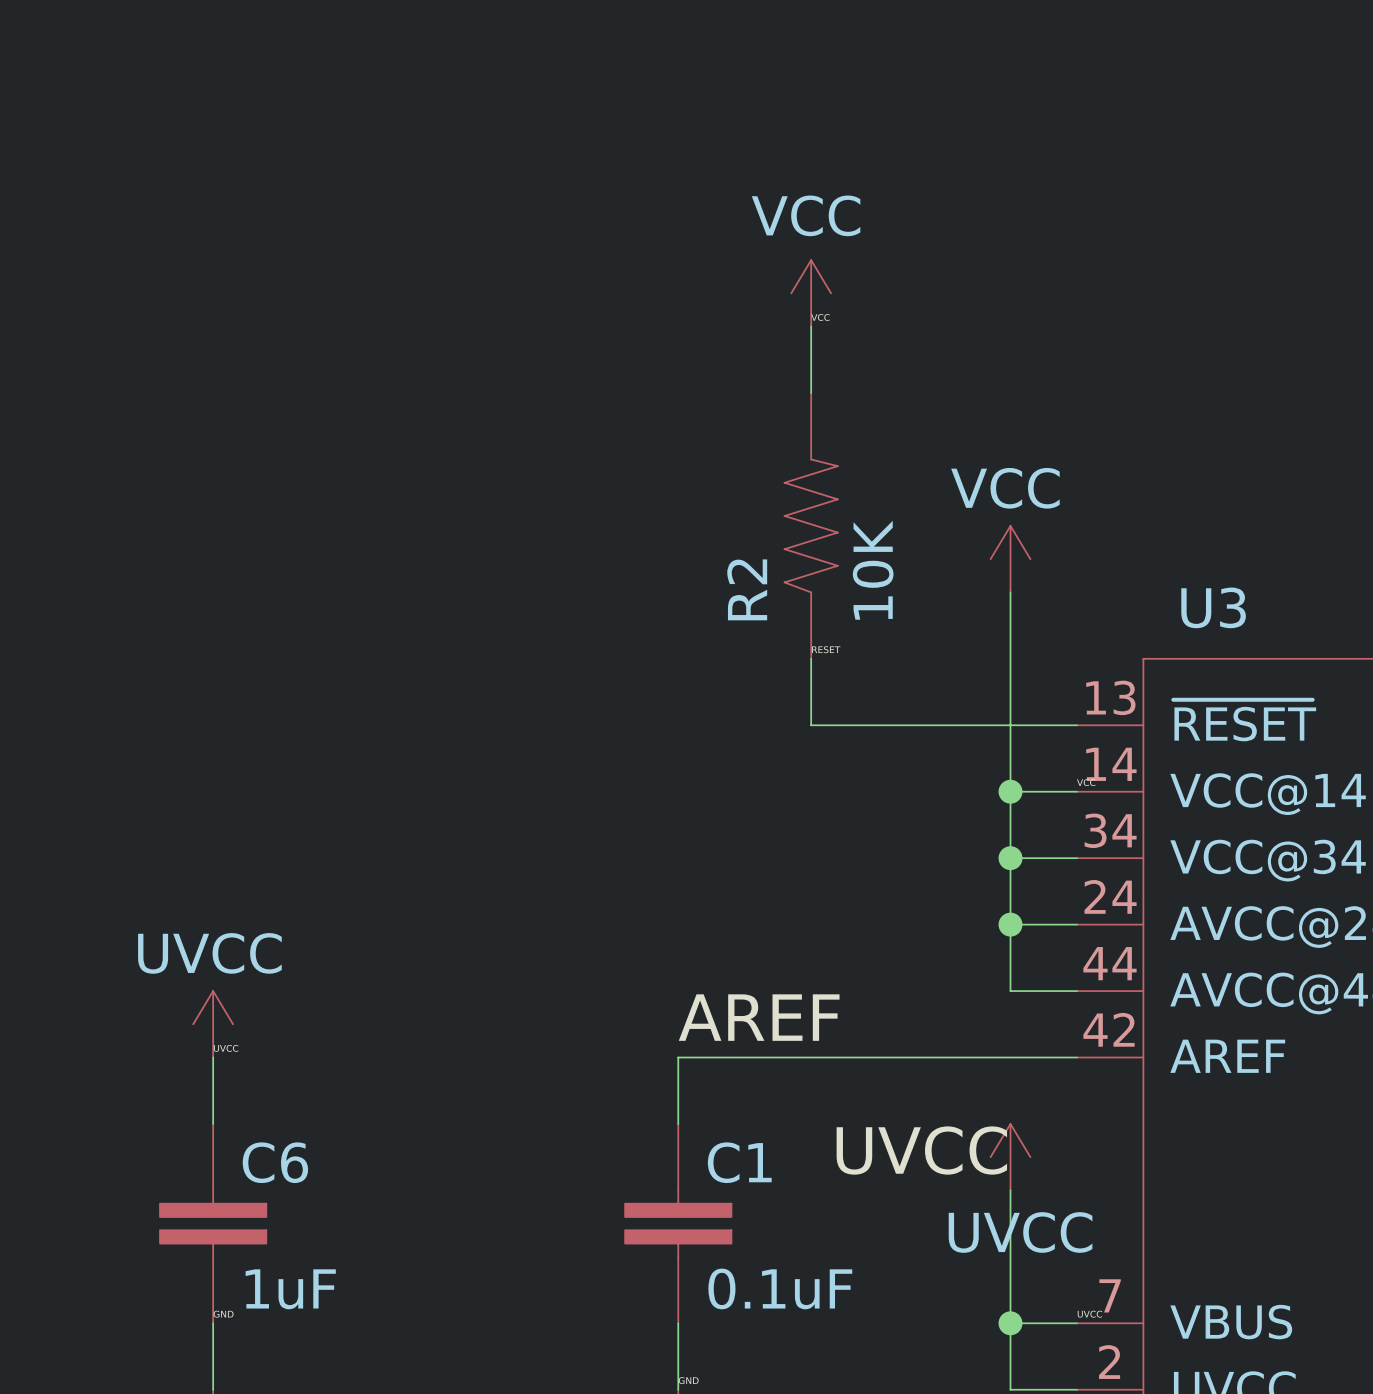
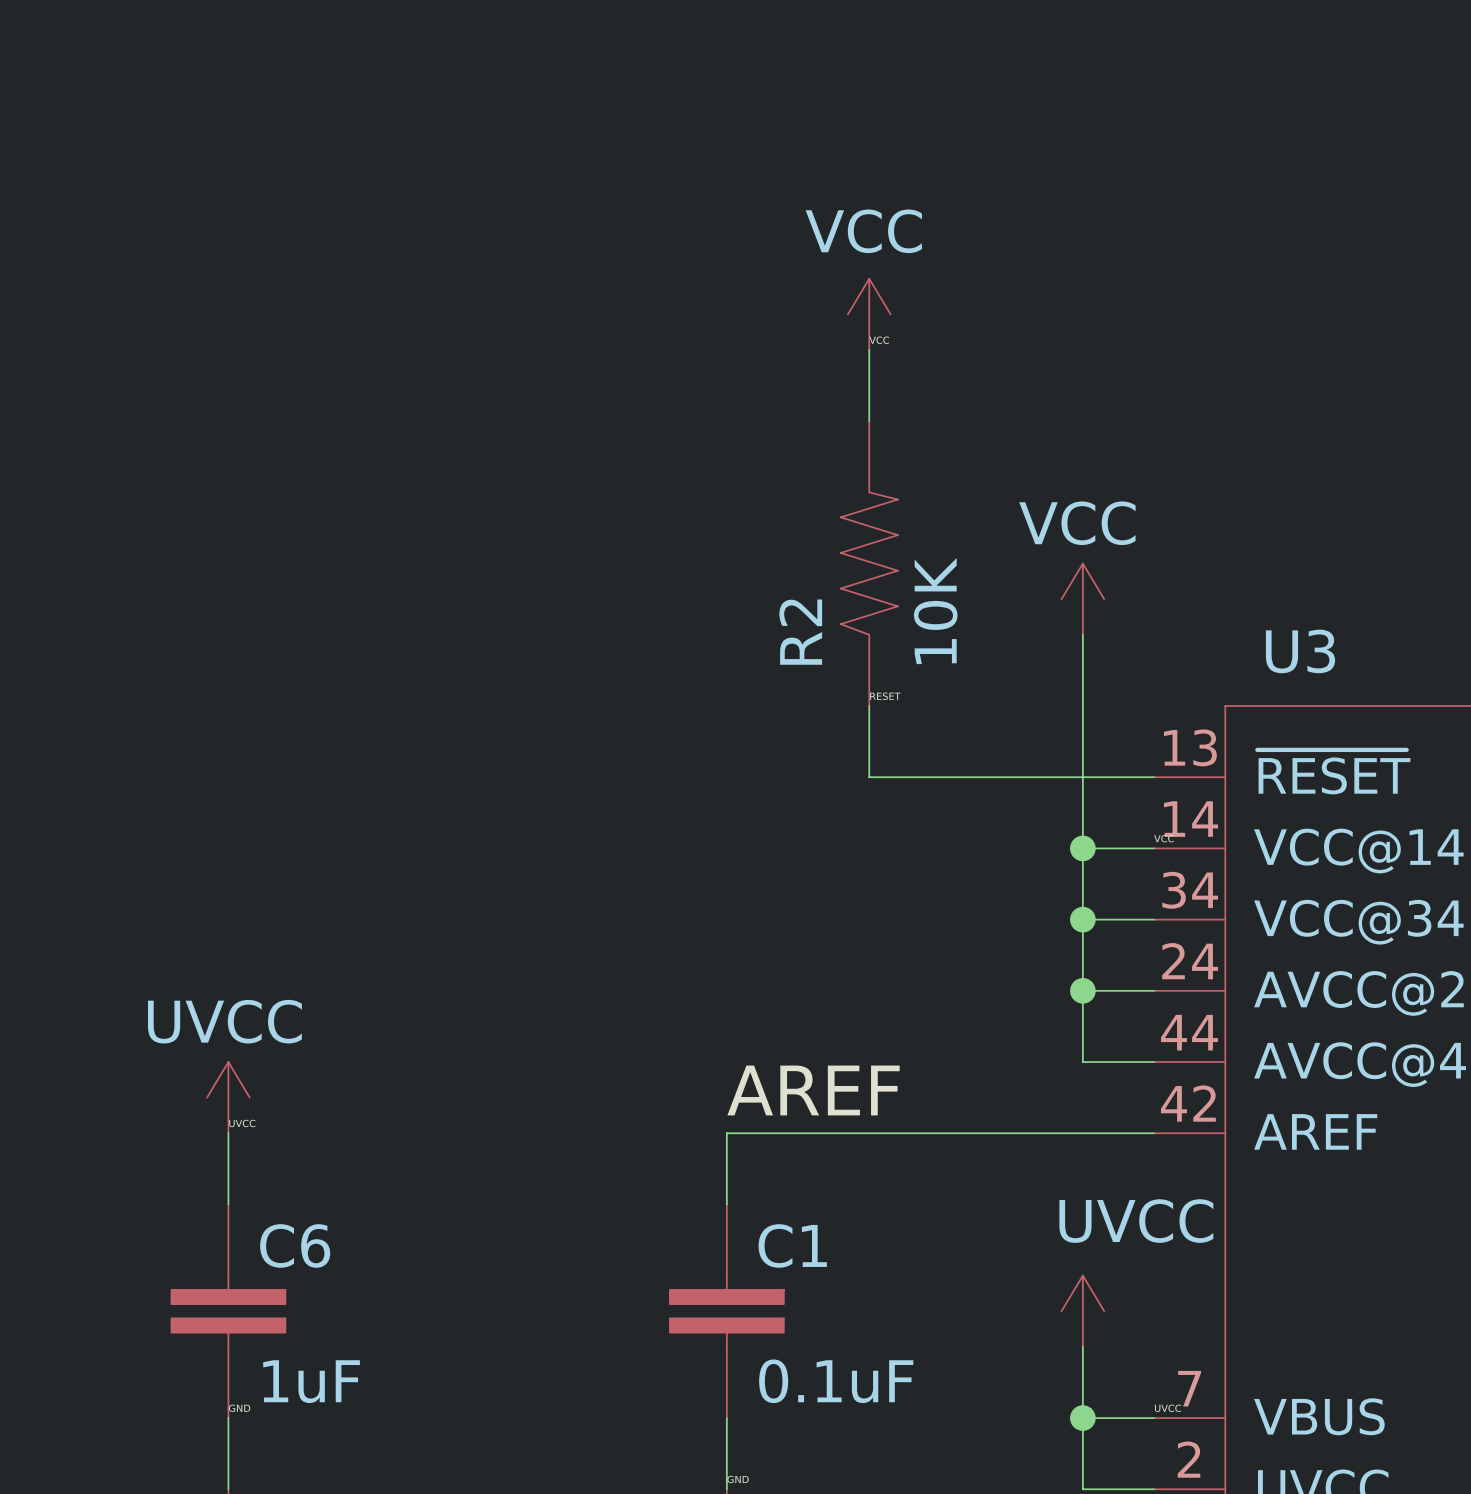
label: UVCC (921, 1150) -> none
power symbol position: UVCC (1010, 1157) -> UVCC (1082, 1311)
power symbol text position: UVCC (1020, 1232) -> UVCC (1136, 1221)

